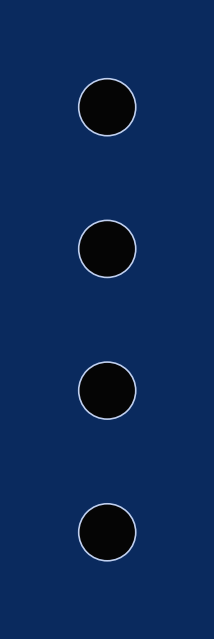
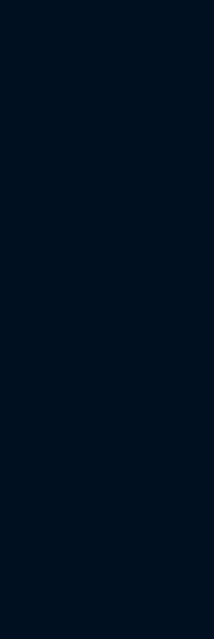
part: (107, 107) -> none
part: (107, 248) -> none
part: (107, 390) -> none
part: (107, 532) -> none

